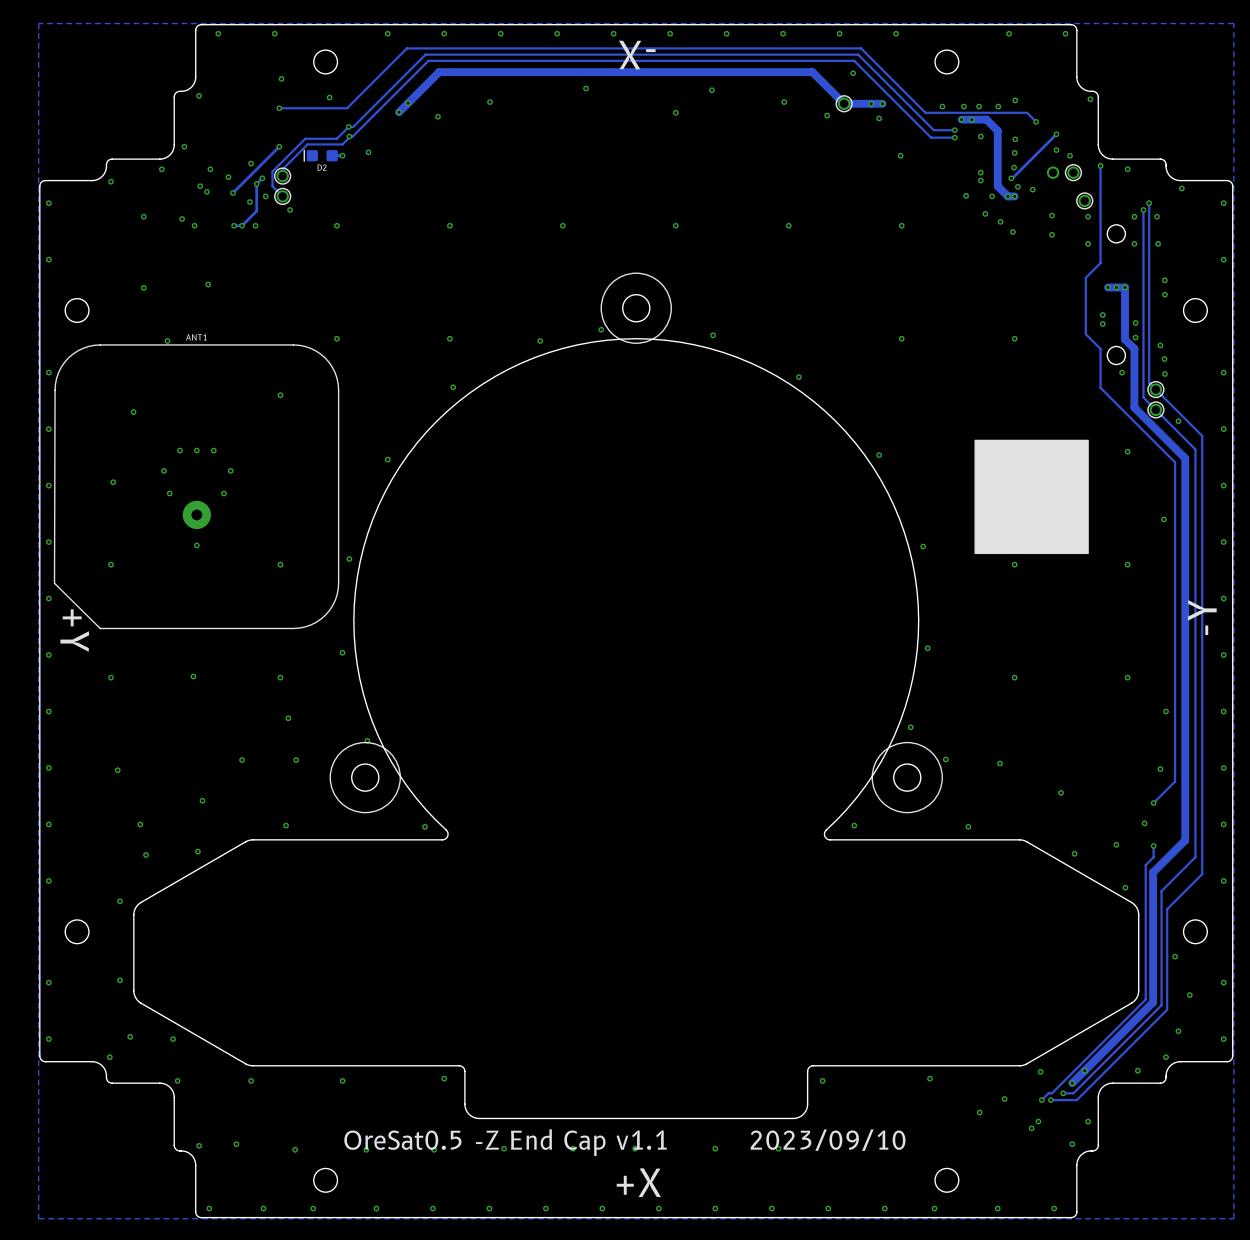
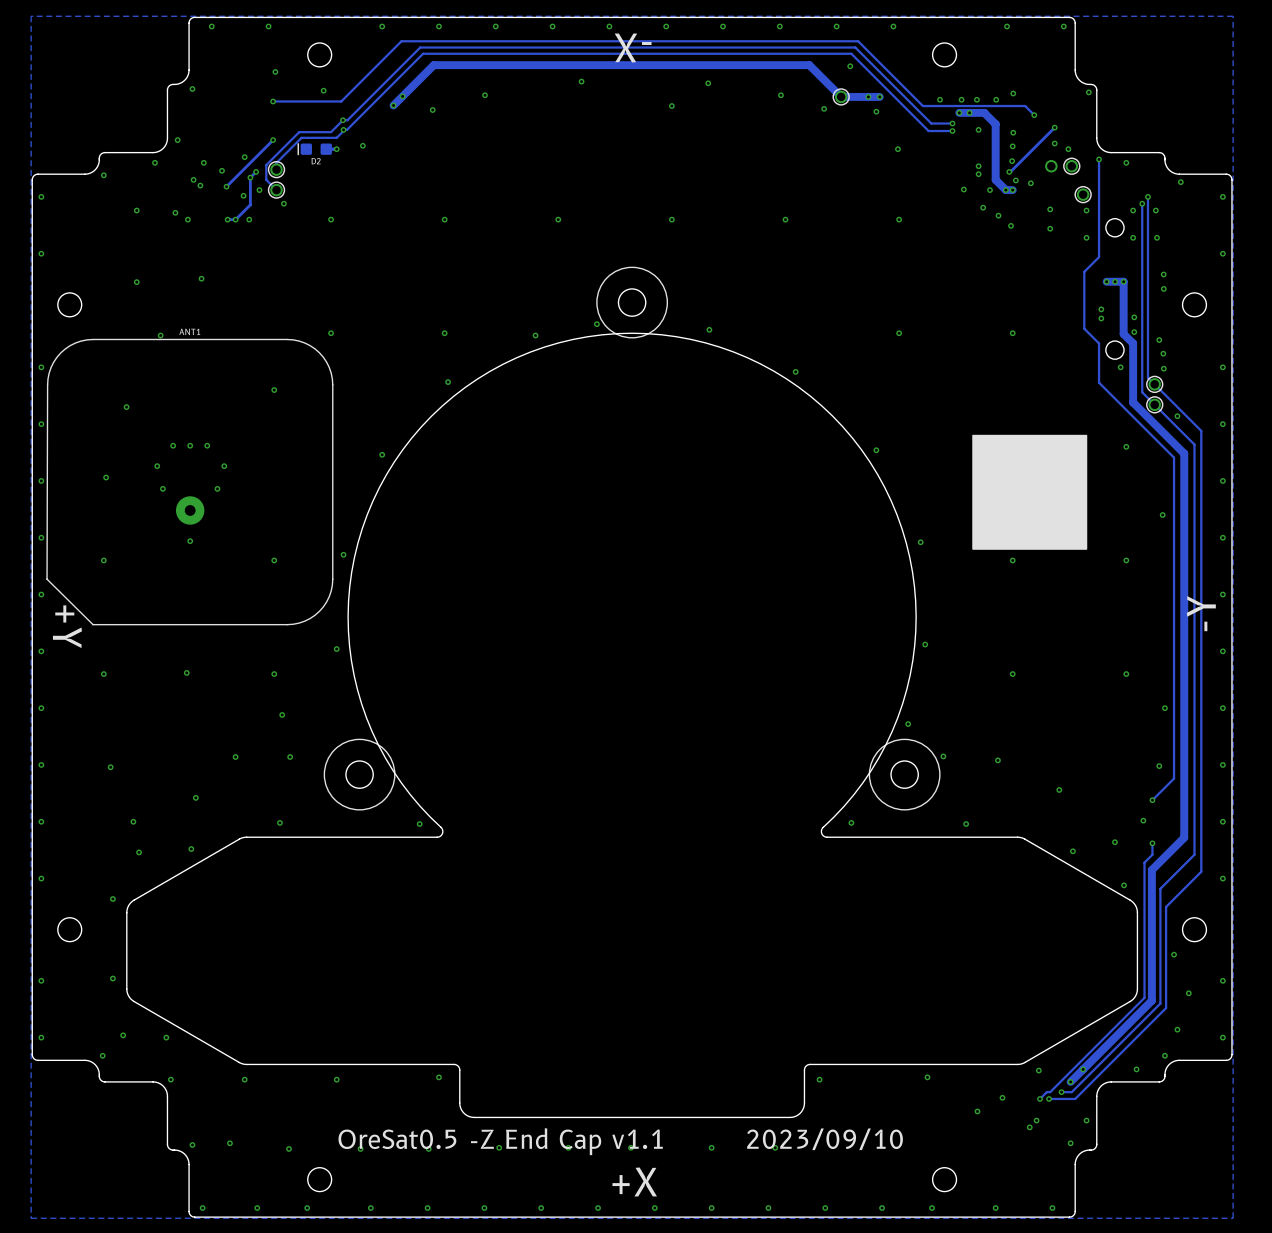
via: (367, 740) -> none

